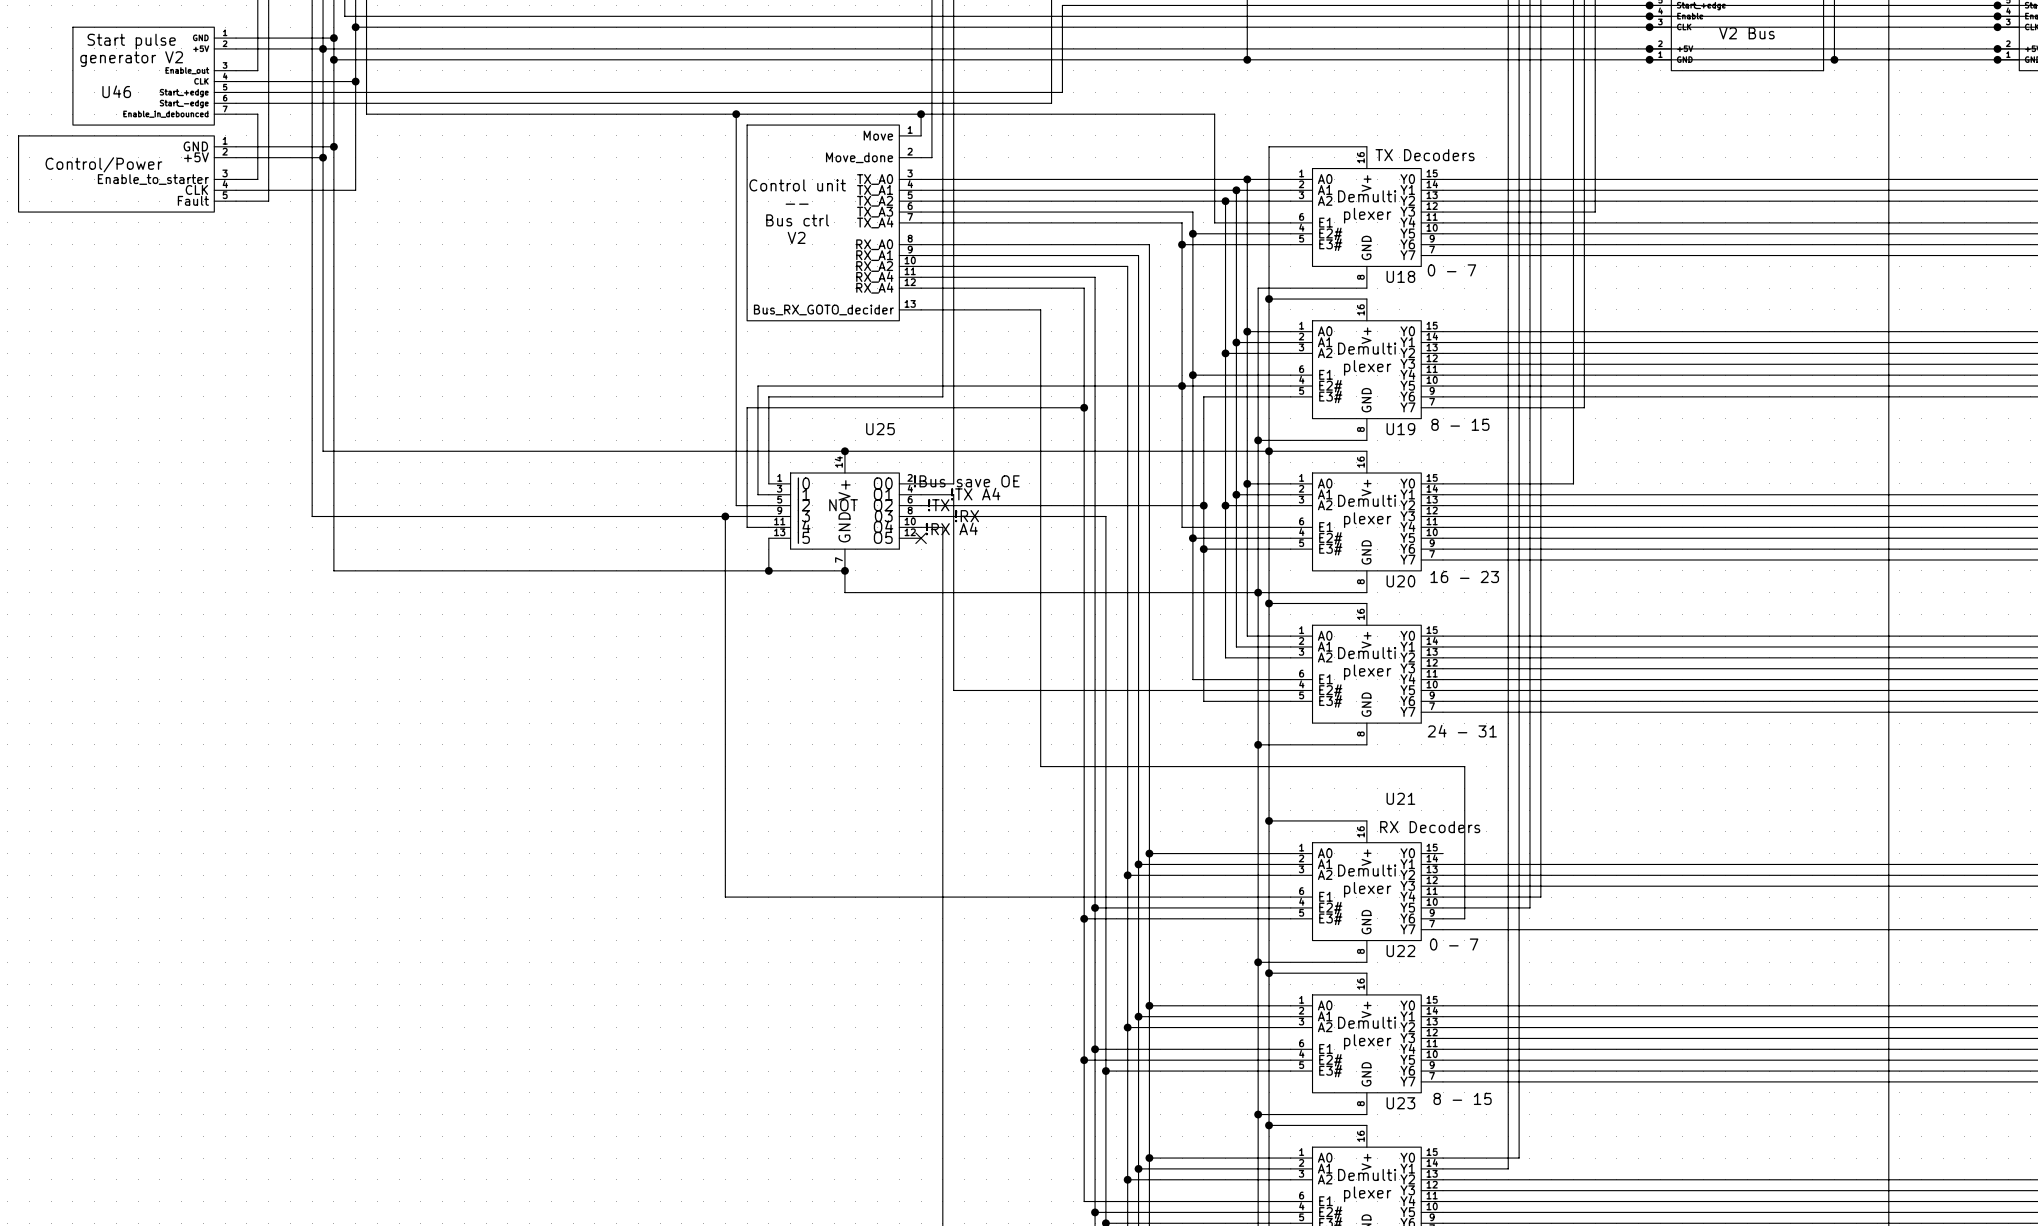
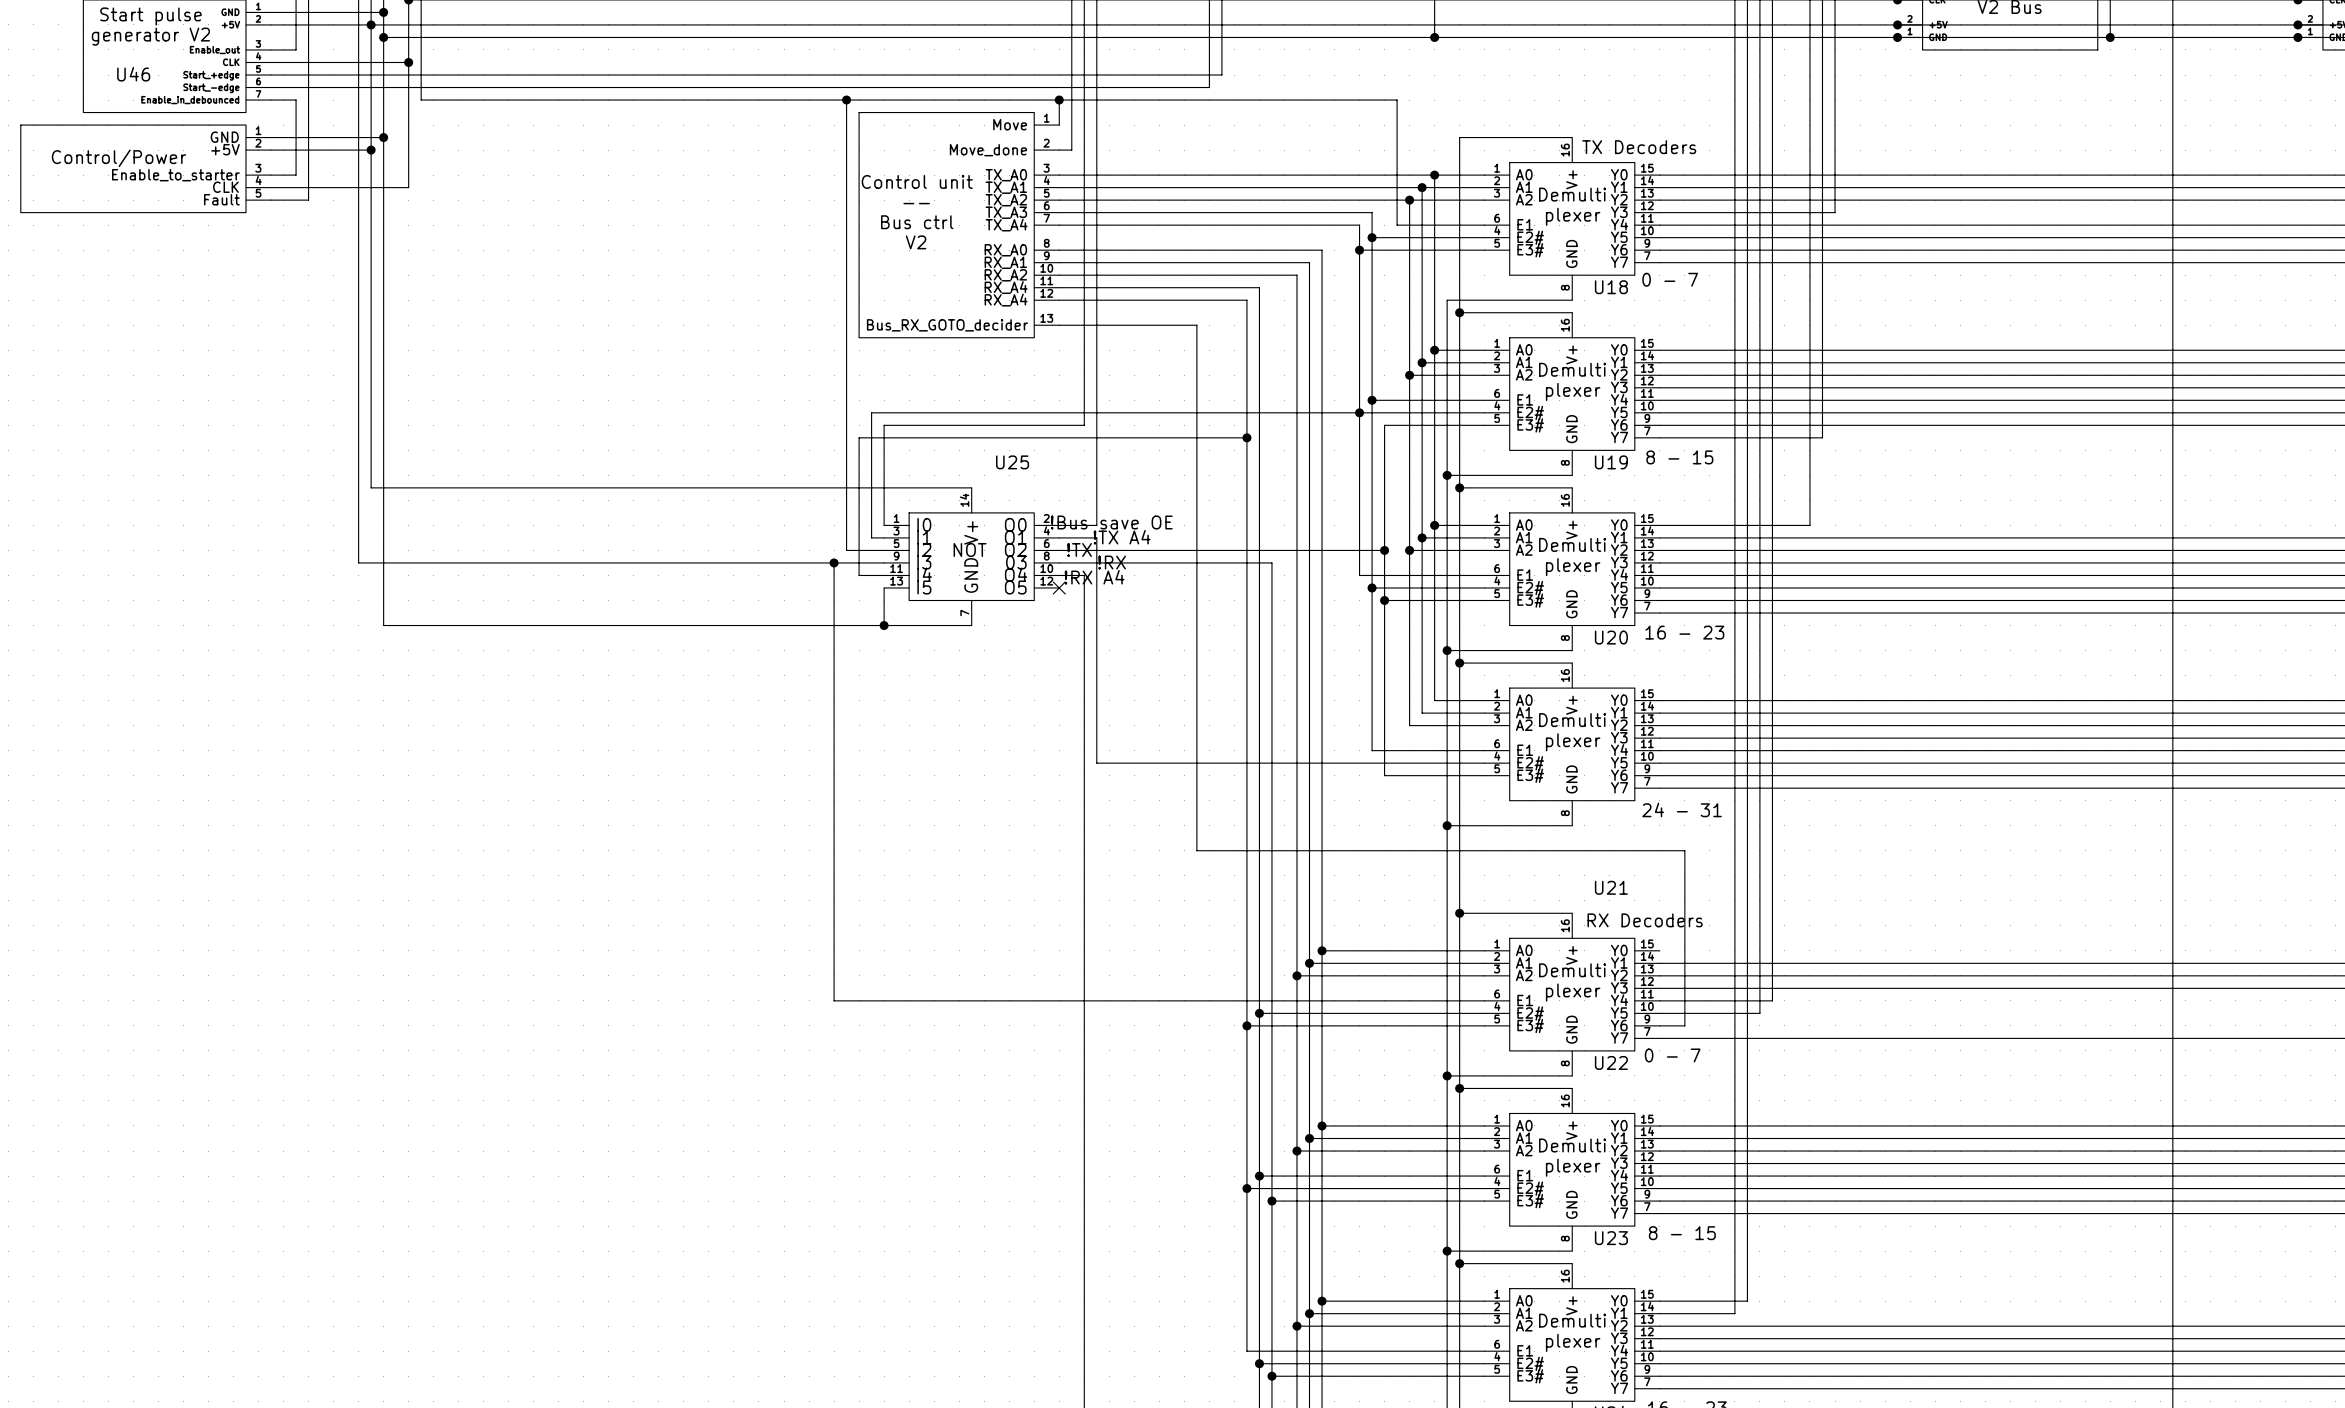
wire: (844, 451) (1269, 451) -> none
junction: (844, 451) -> none
wire: (844, 570) (844, 592) (1258, 592) -> none
junction: (844, 570) -> none

